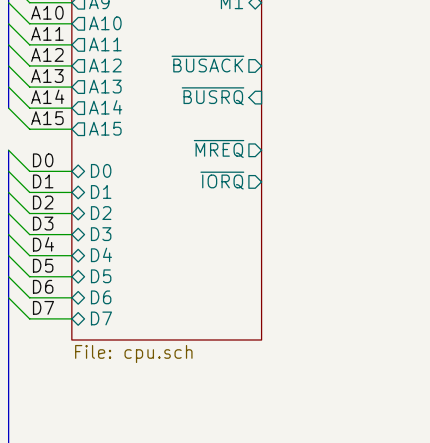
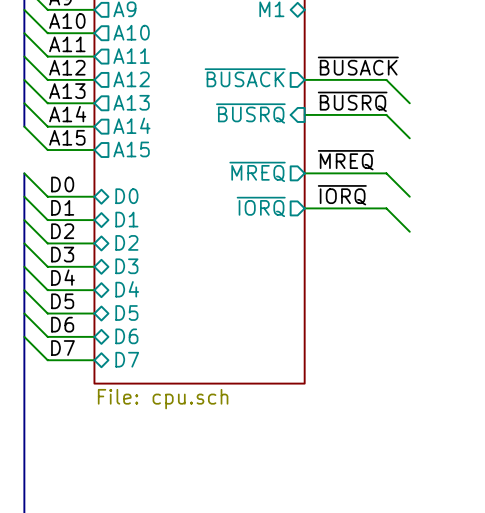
label: none -> ~{BUSACK} (358, 66)
wire: none -> (304, 79) (386, 79) (409, 103)
label: none -> ~{BUSRQ} (352, 101)
wire: none -> (304, 114) (386, 114) (409, 138)
label: none -> ~{MREQ} (345, 160)
wire: none -> (304, 173) (386, 173) (409, 196)
label: none -> ~{IORQ} (342, 195)
wire: none -> (304, 208) (386, 208) (409, 231)

